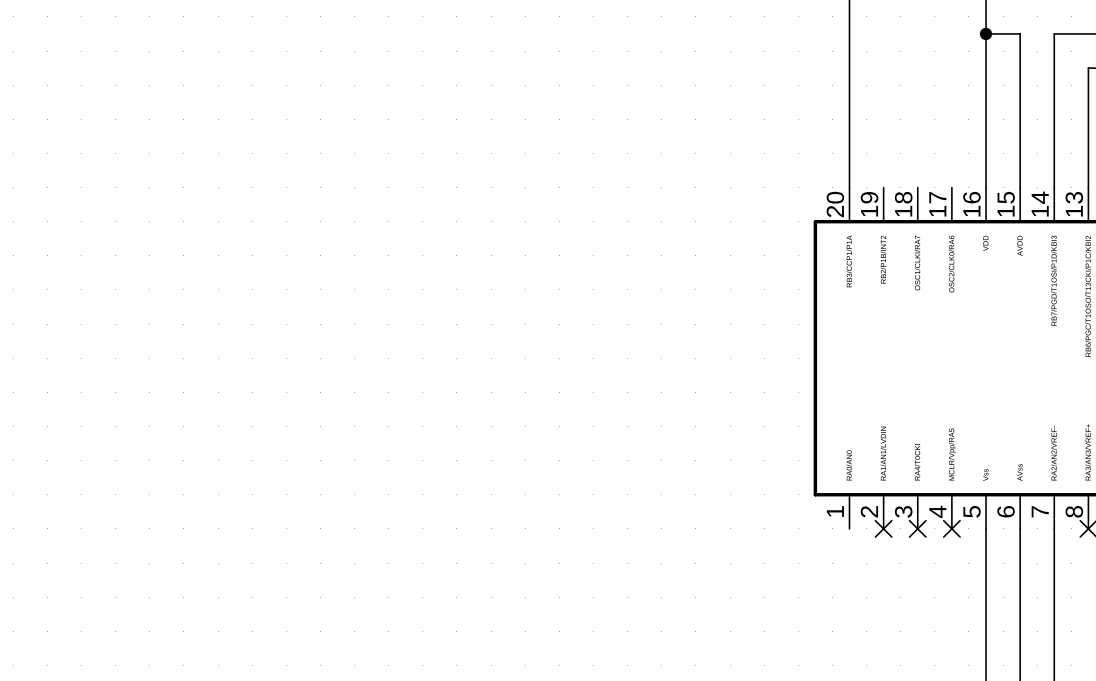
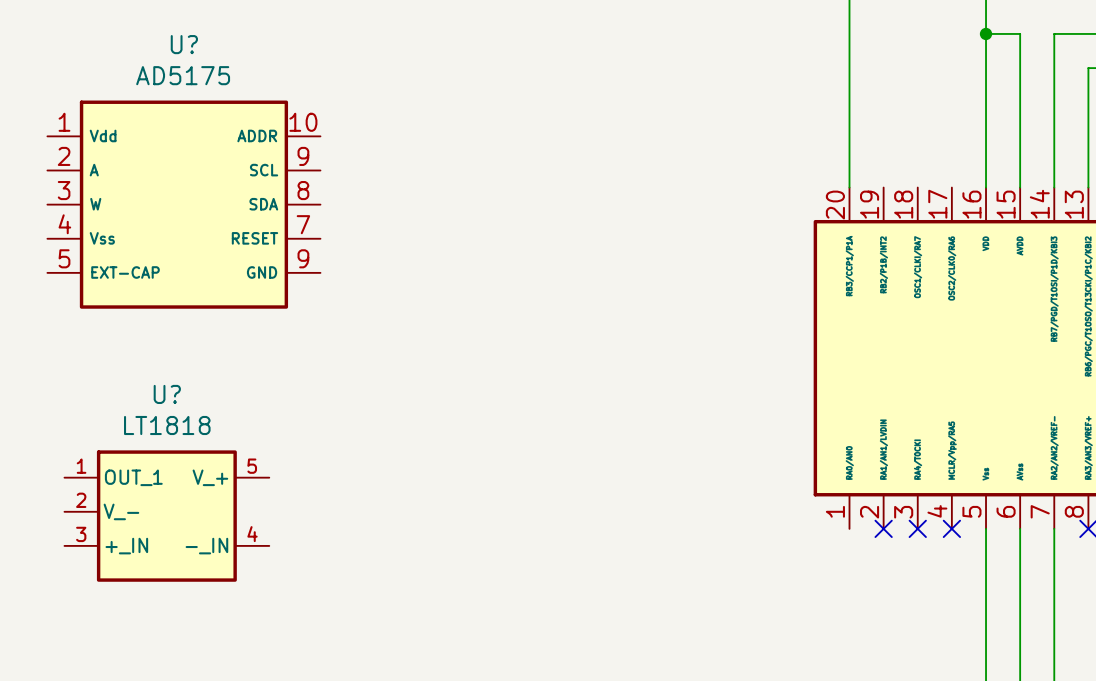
U?: none -> AD5175 (183, 204)
U?: none -> LT1818 (166, 516)

